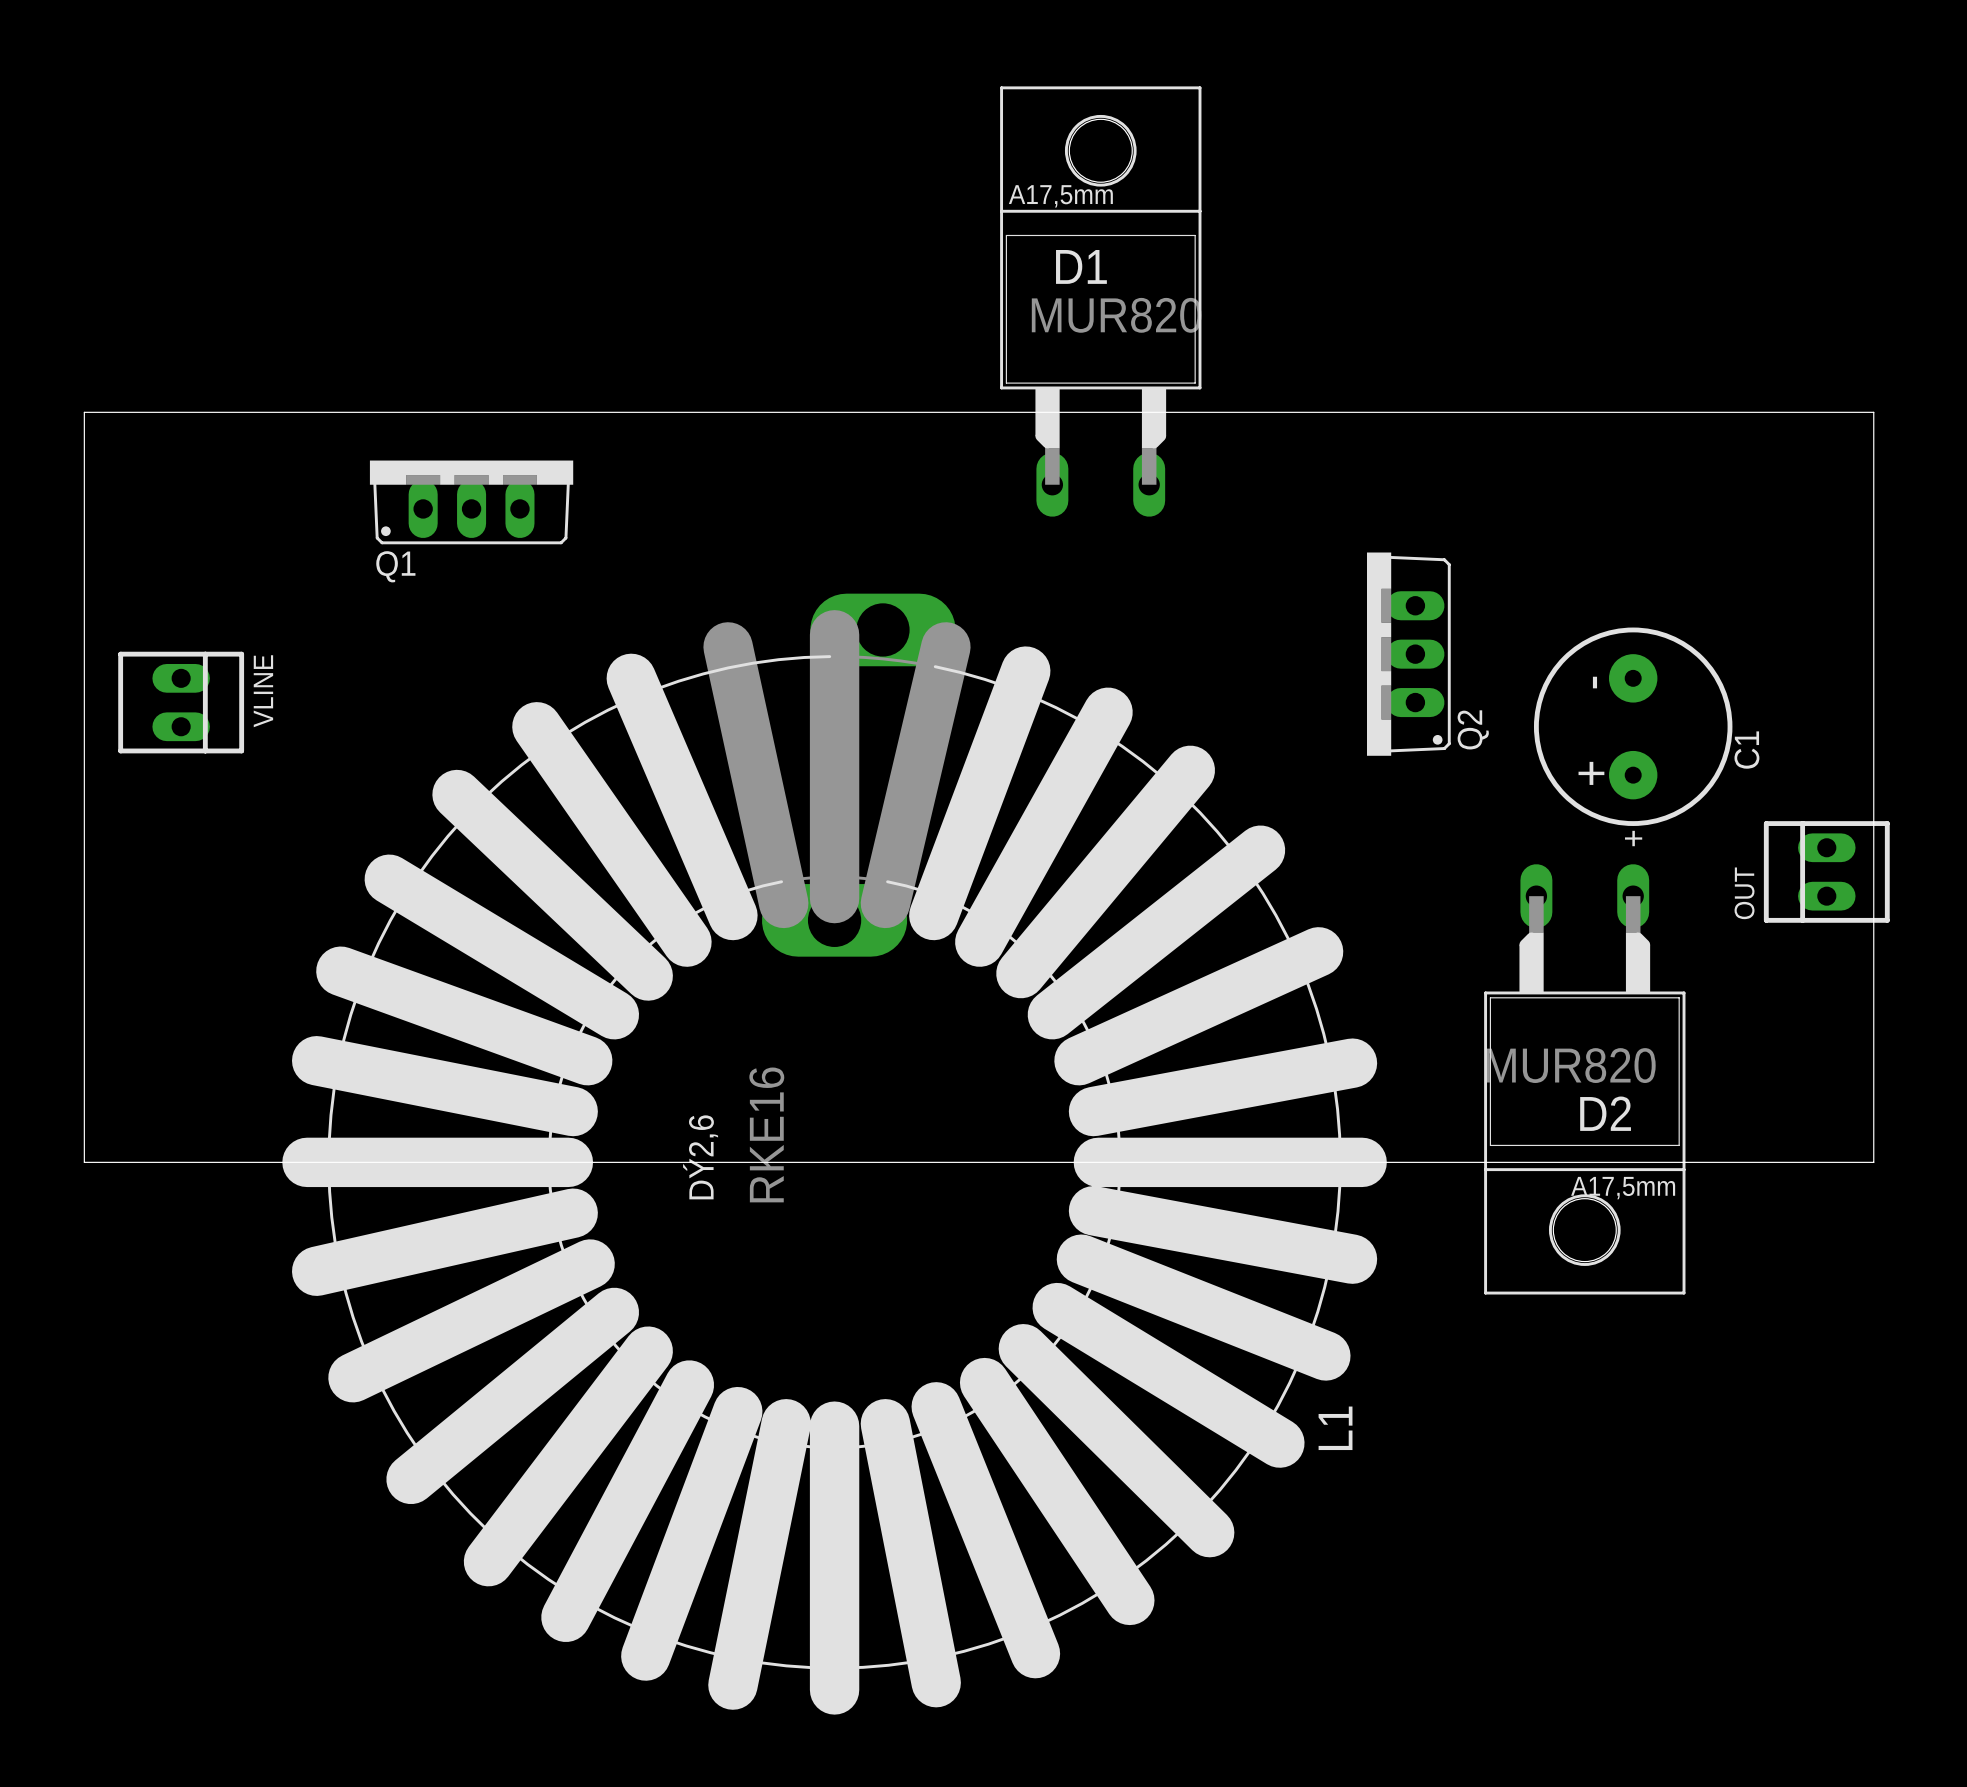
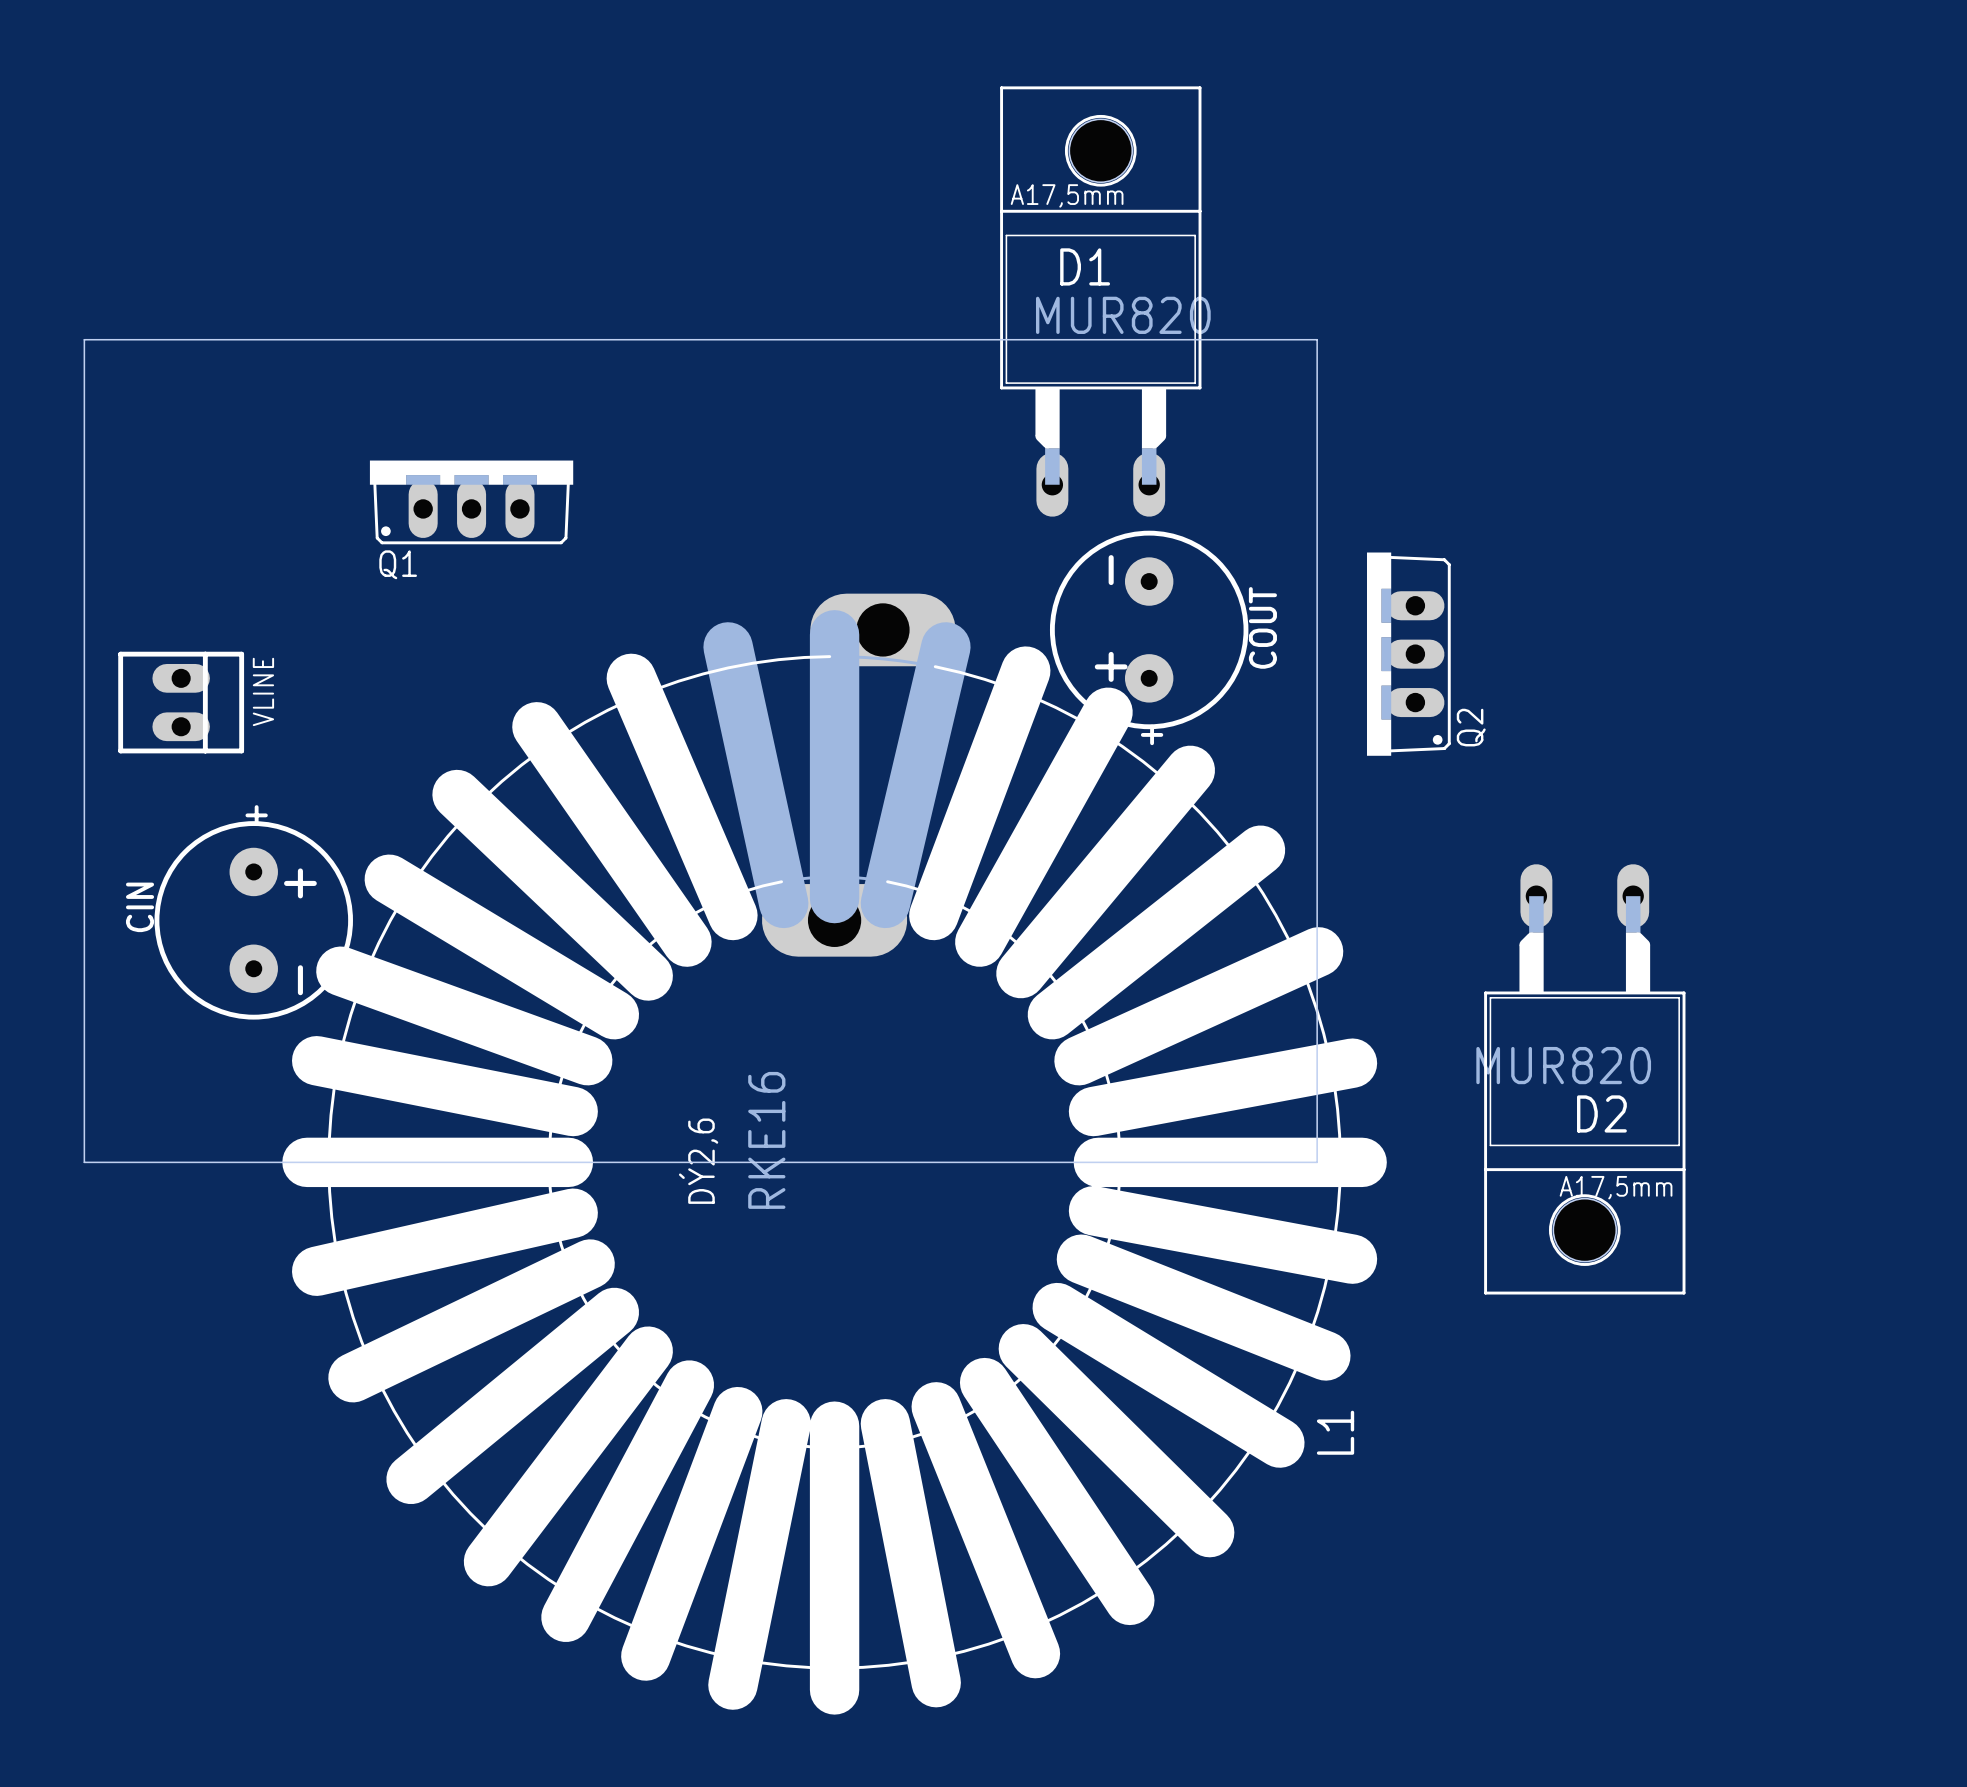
board edge: (84, 412) (1873, 412) (1873, 1162) (1317, 1162) -> (84, 412) (84, 339) (1317, 339) (1317, 1162)
COUT: none -> (1149, 629)
C1: (1633, 726) -> none
OUT: (1826, 871) -> none
CIN: none -> (253, 920)

